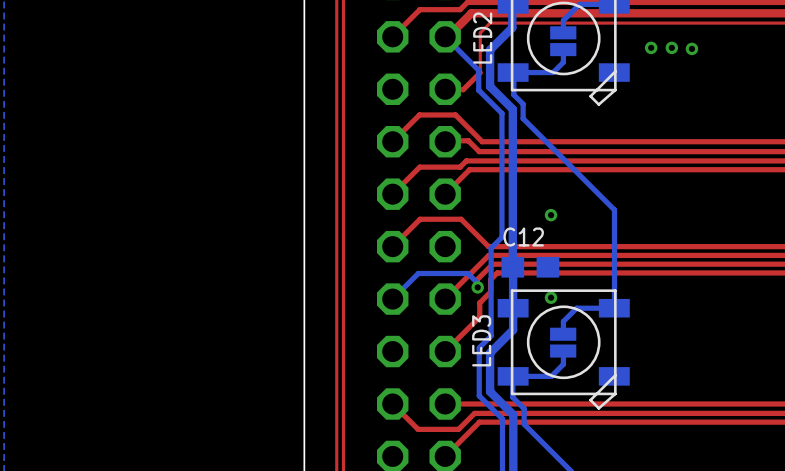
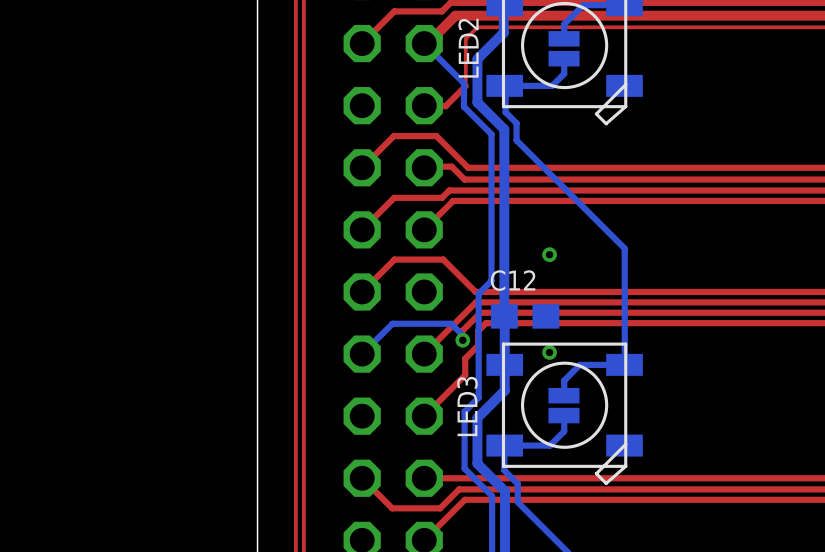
via: (651, 47) -> none
via: (671, 47) -> none
via: (691, 48) -> none

